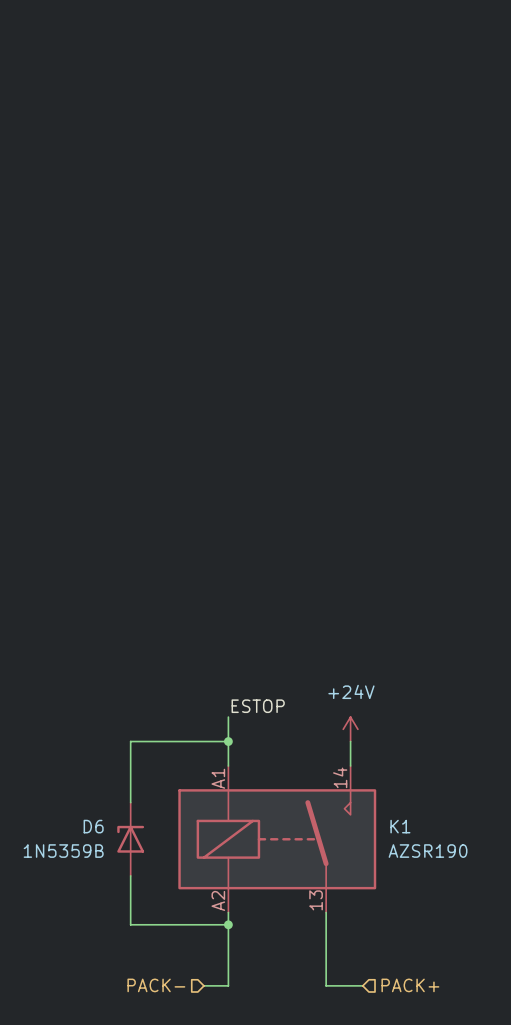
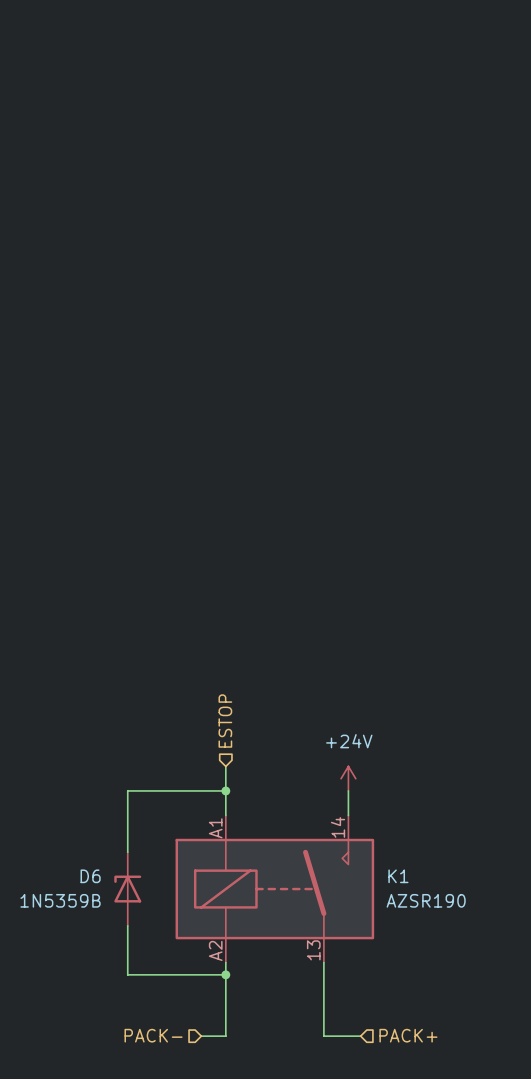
hierarchical label: none -> ESTOP (225, 721)
label: ESTOP (258, 706) -> none

